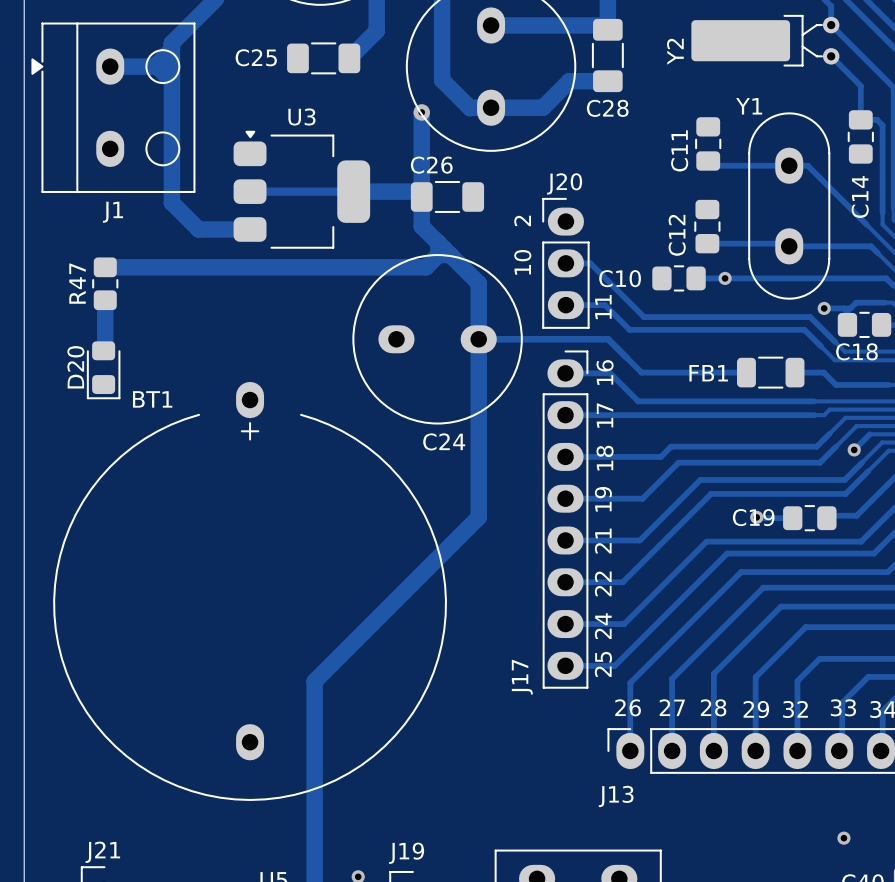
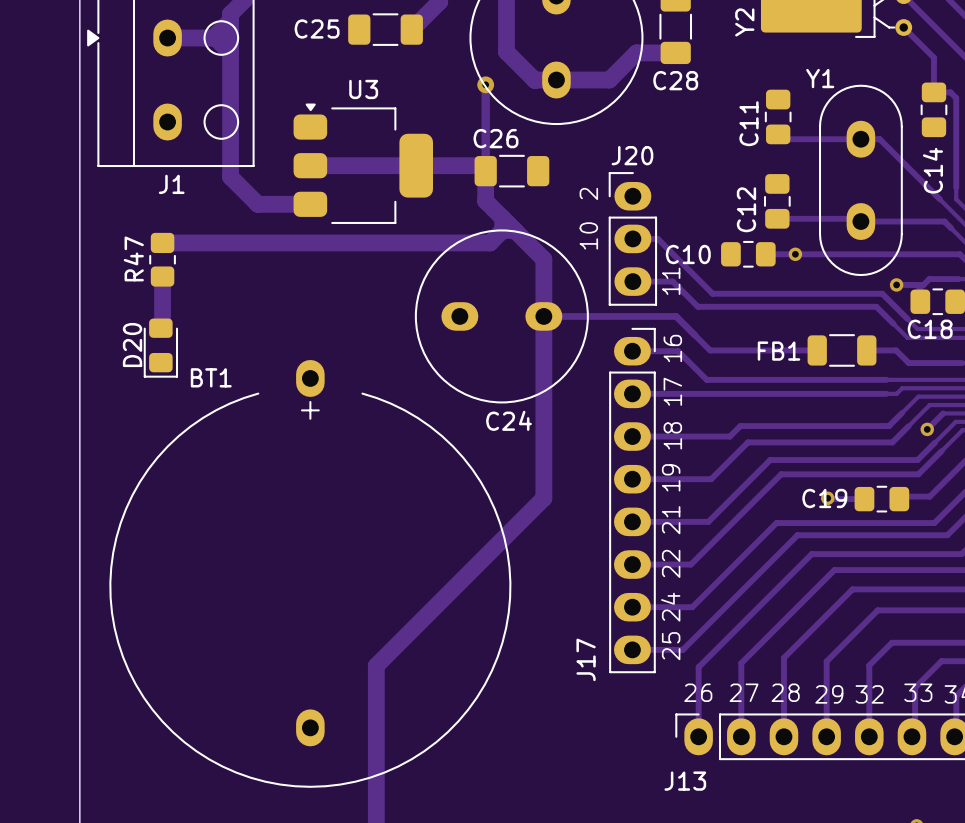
track width: thick (421, 112) (421, 196) -> thin (485, 84) (485, 171)
track width: thin (250, 191) (353, 191) -> thick (310, 165) (416, 165)

